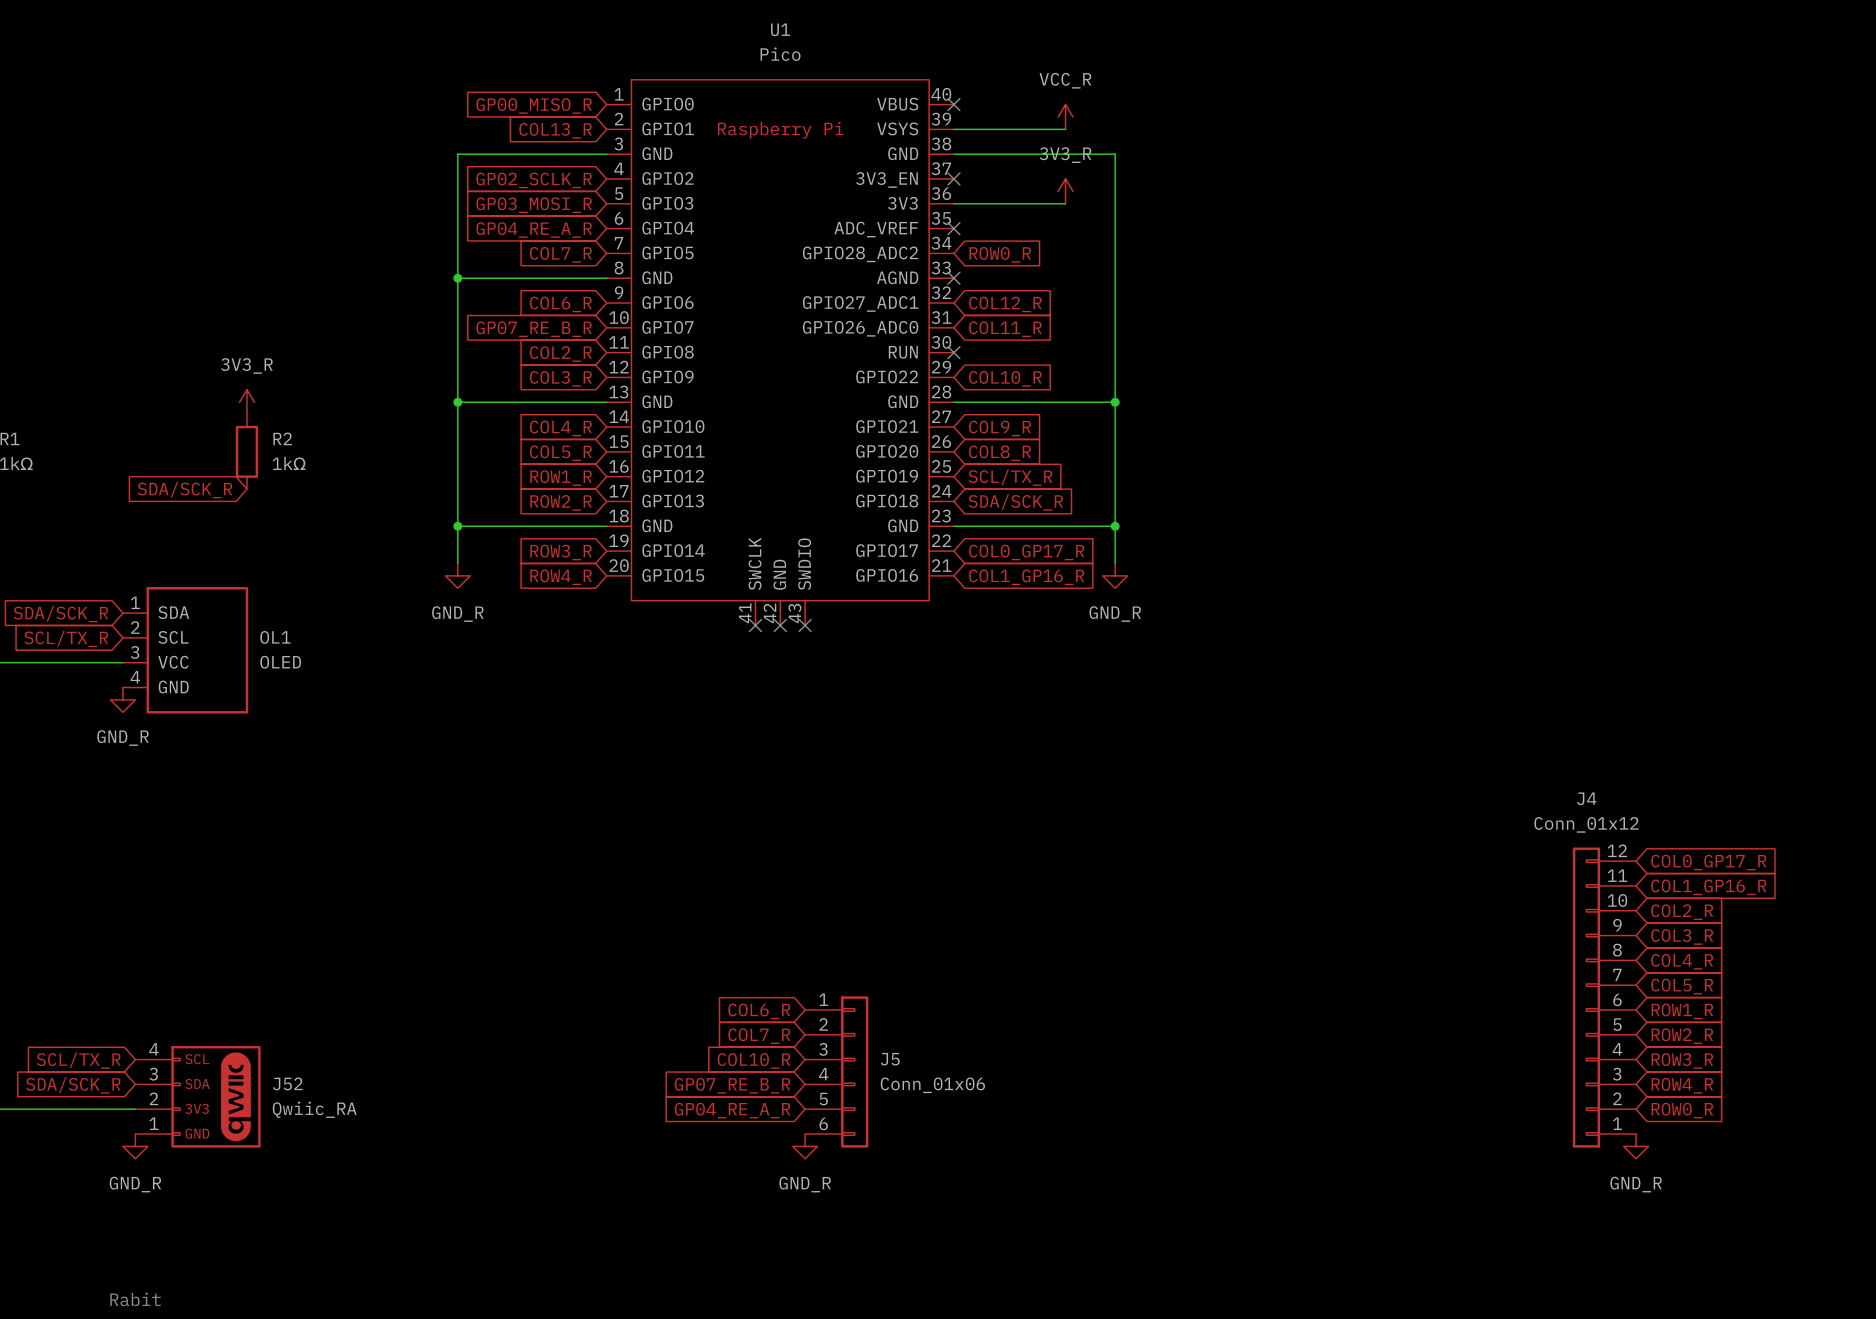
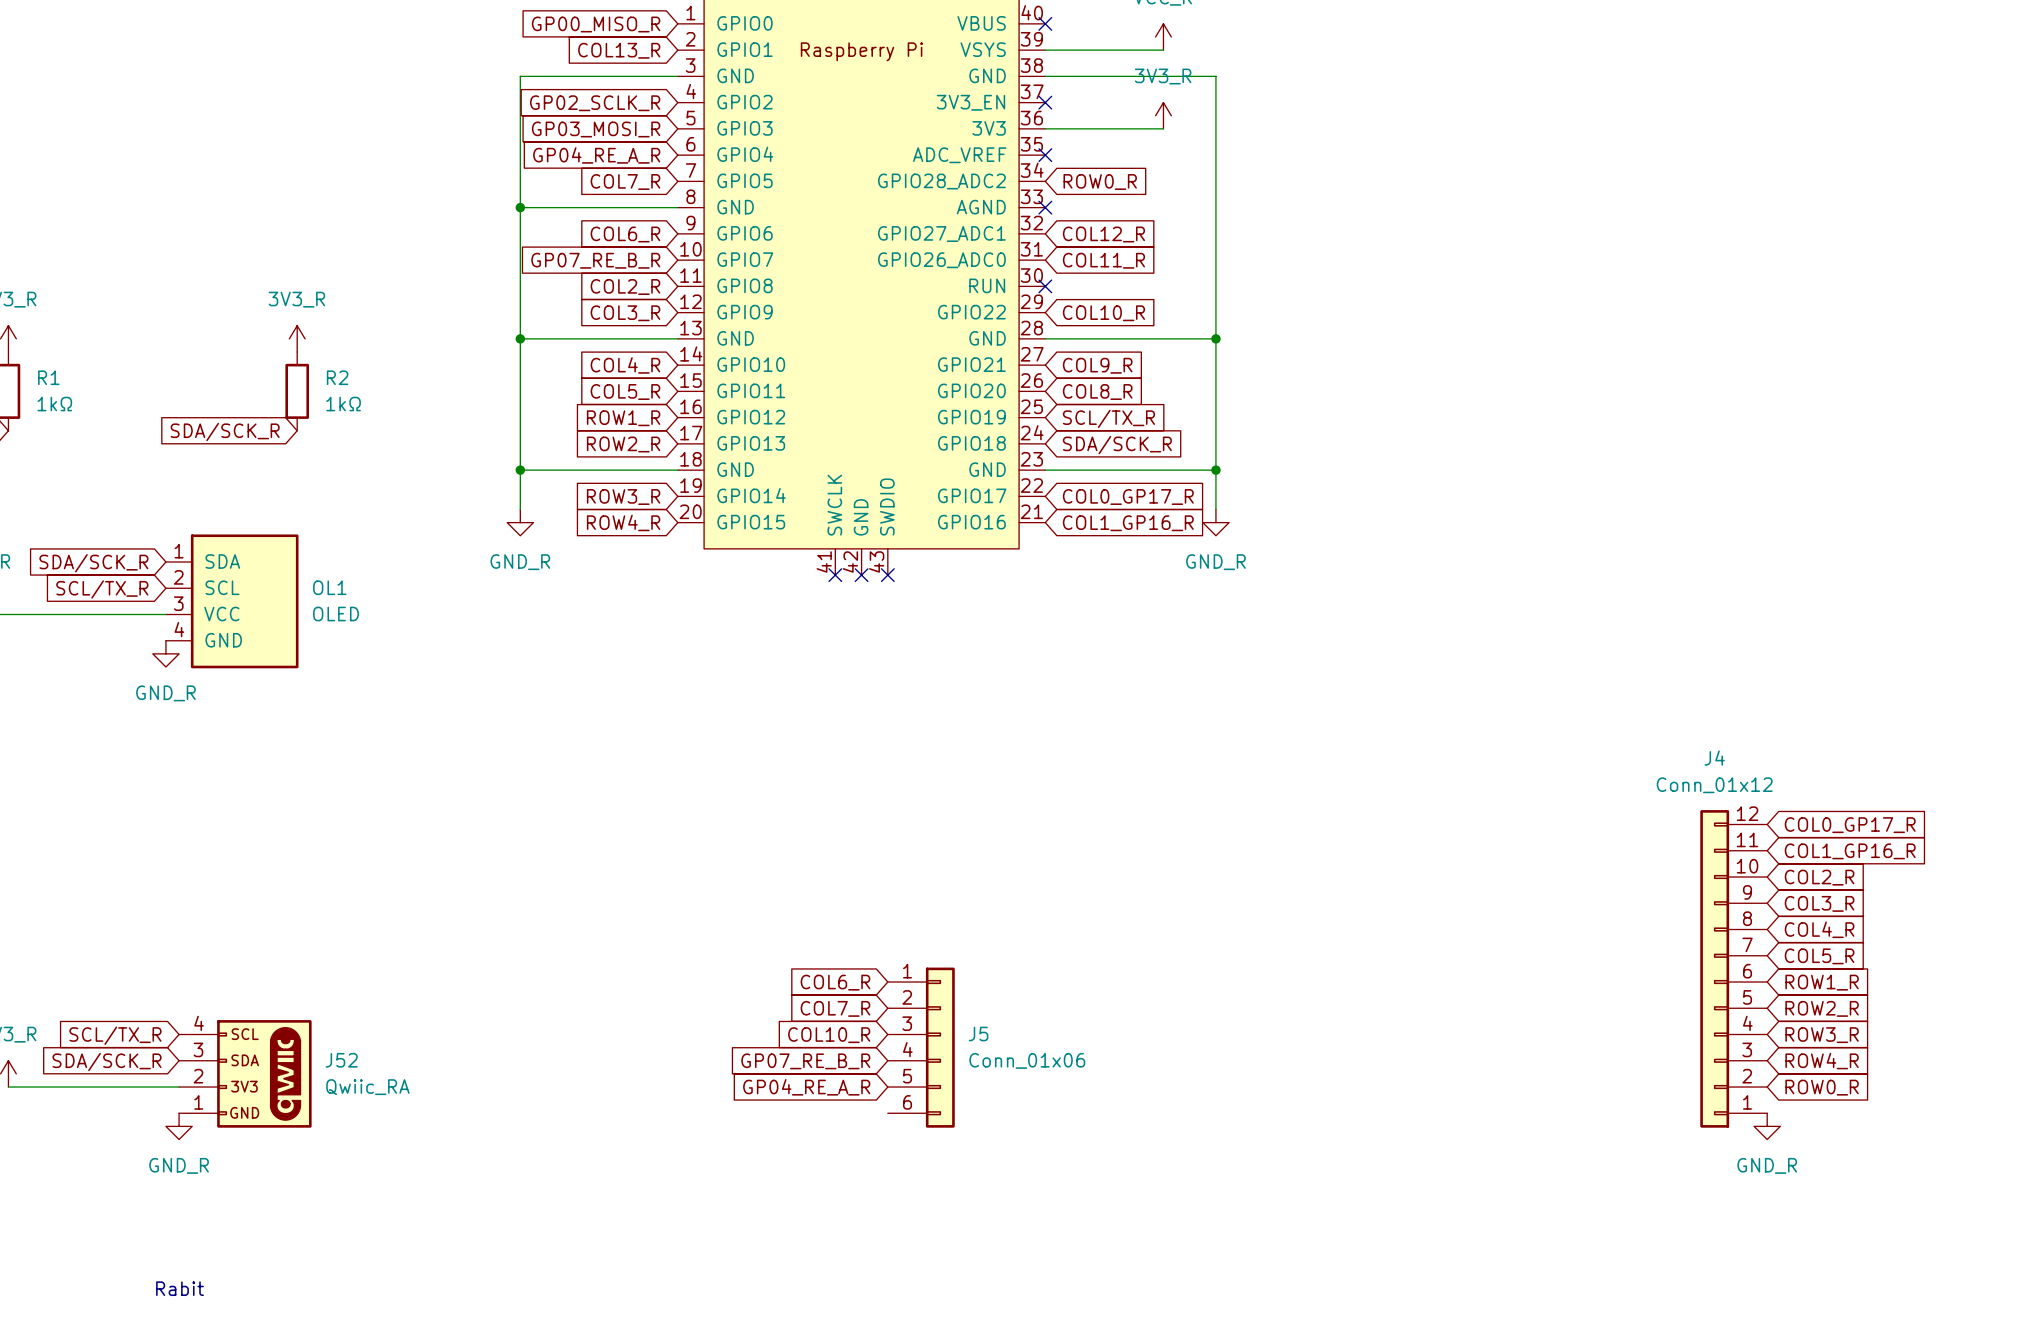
power symbol: GND_R (805, 1146) -> none

